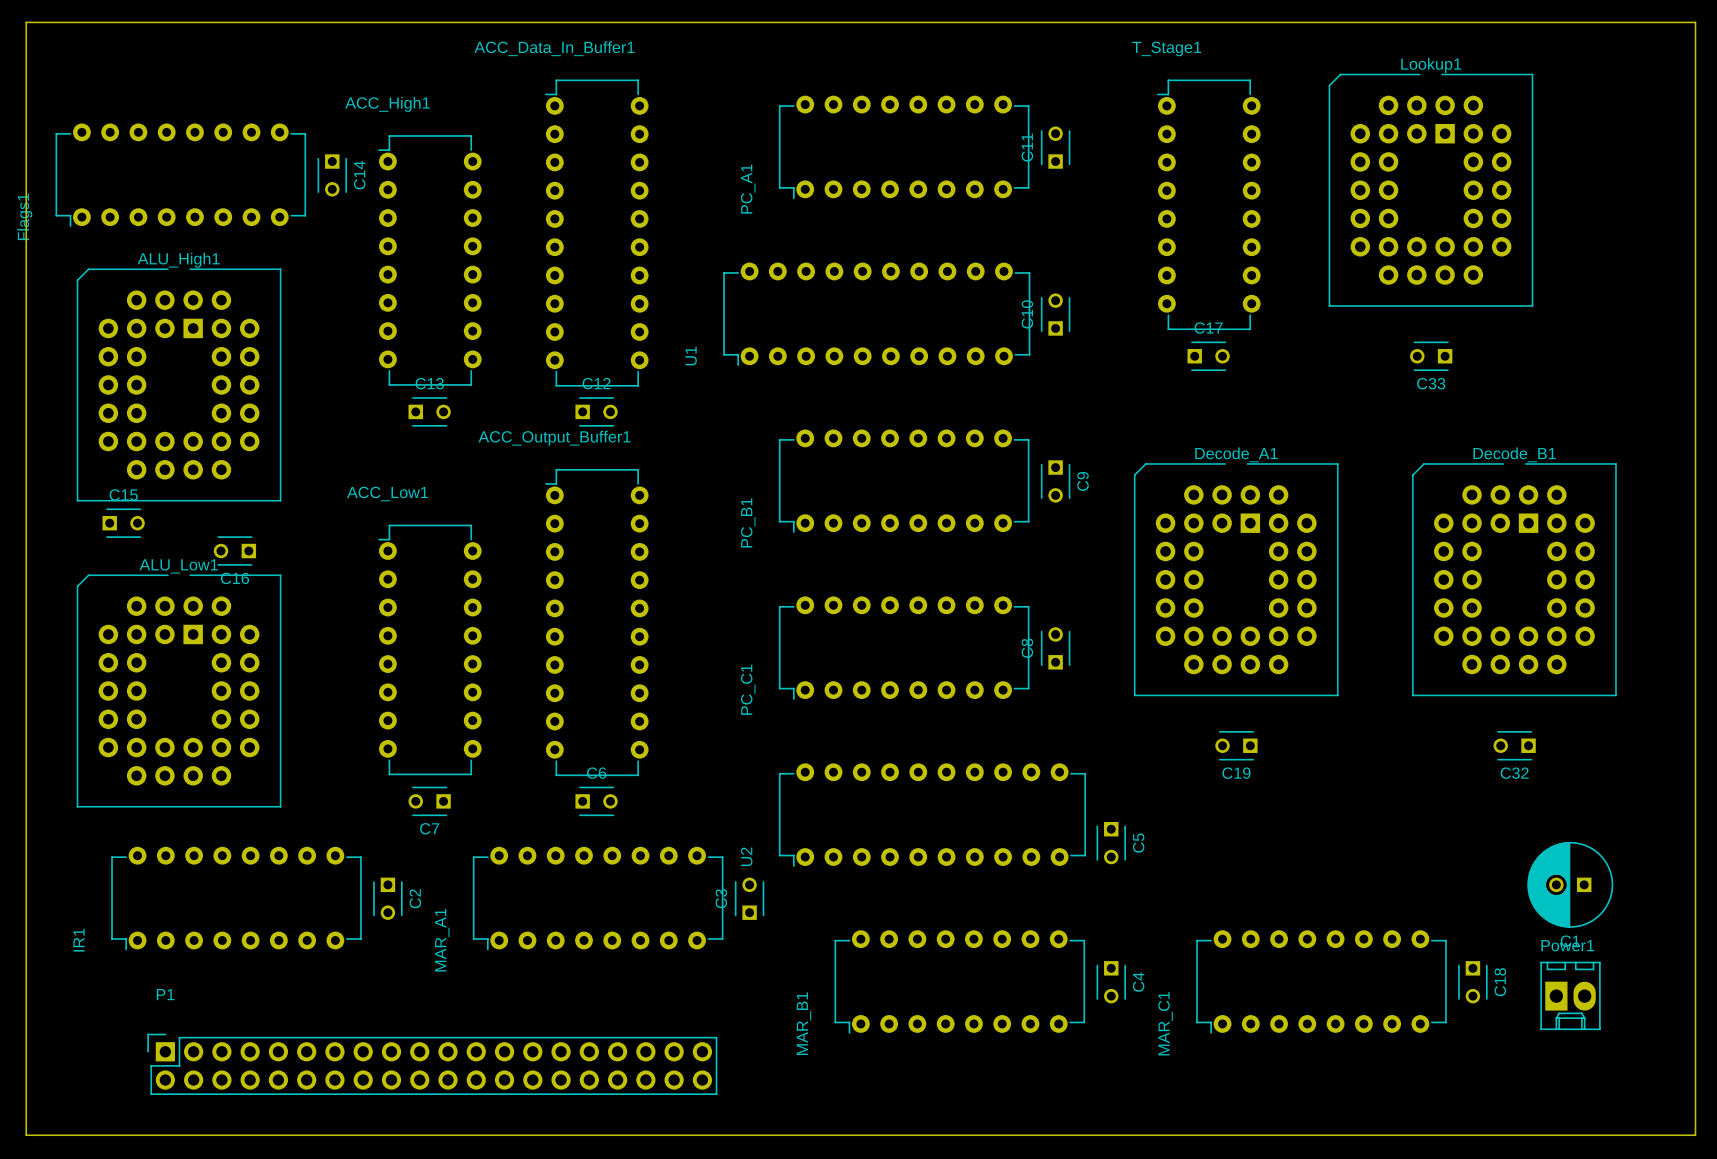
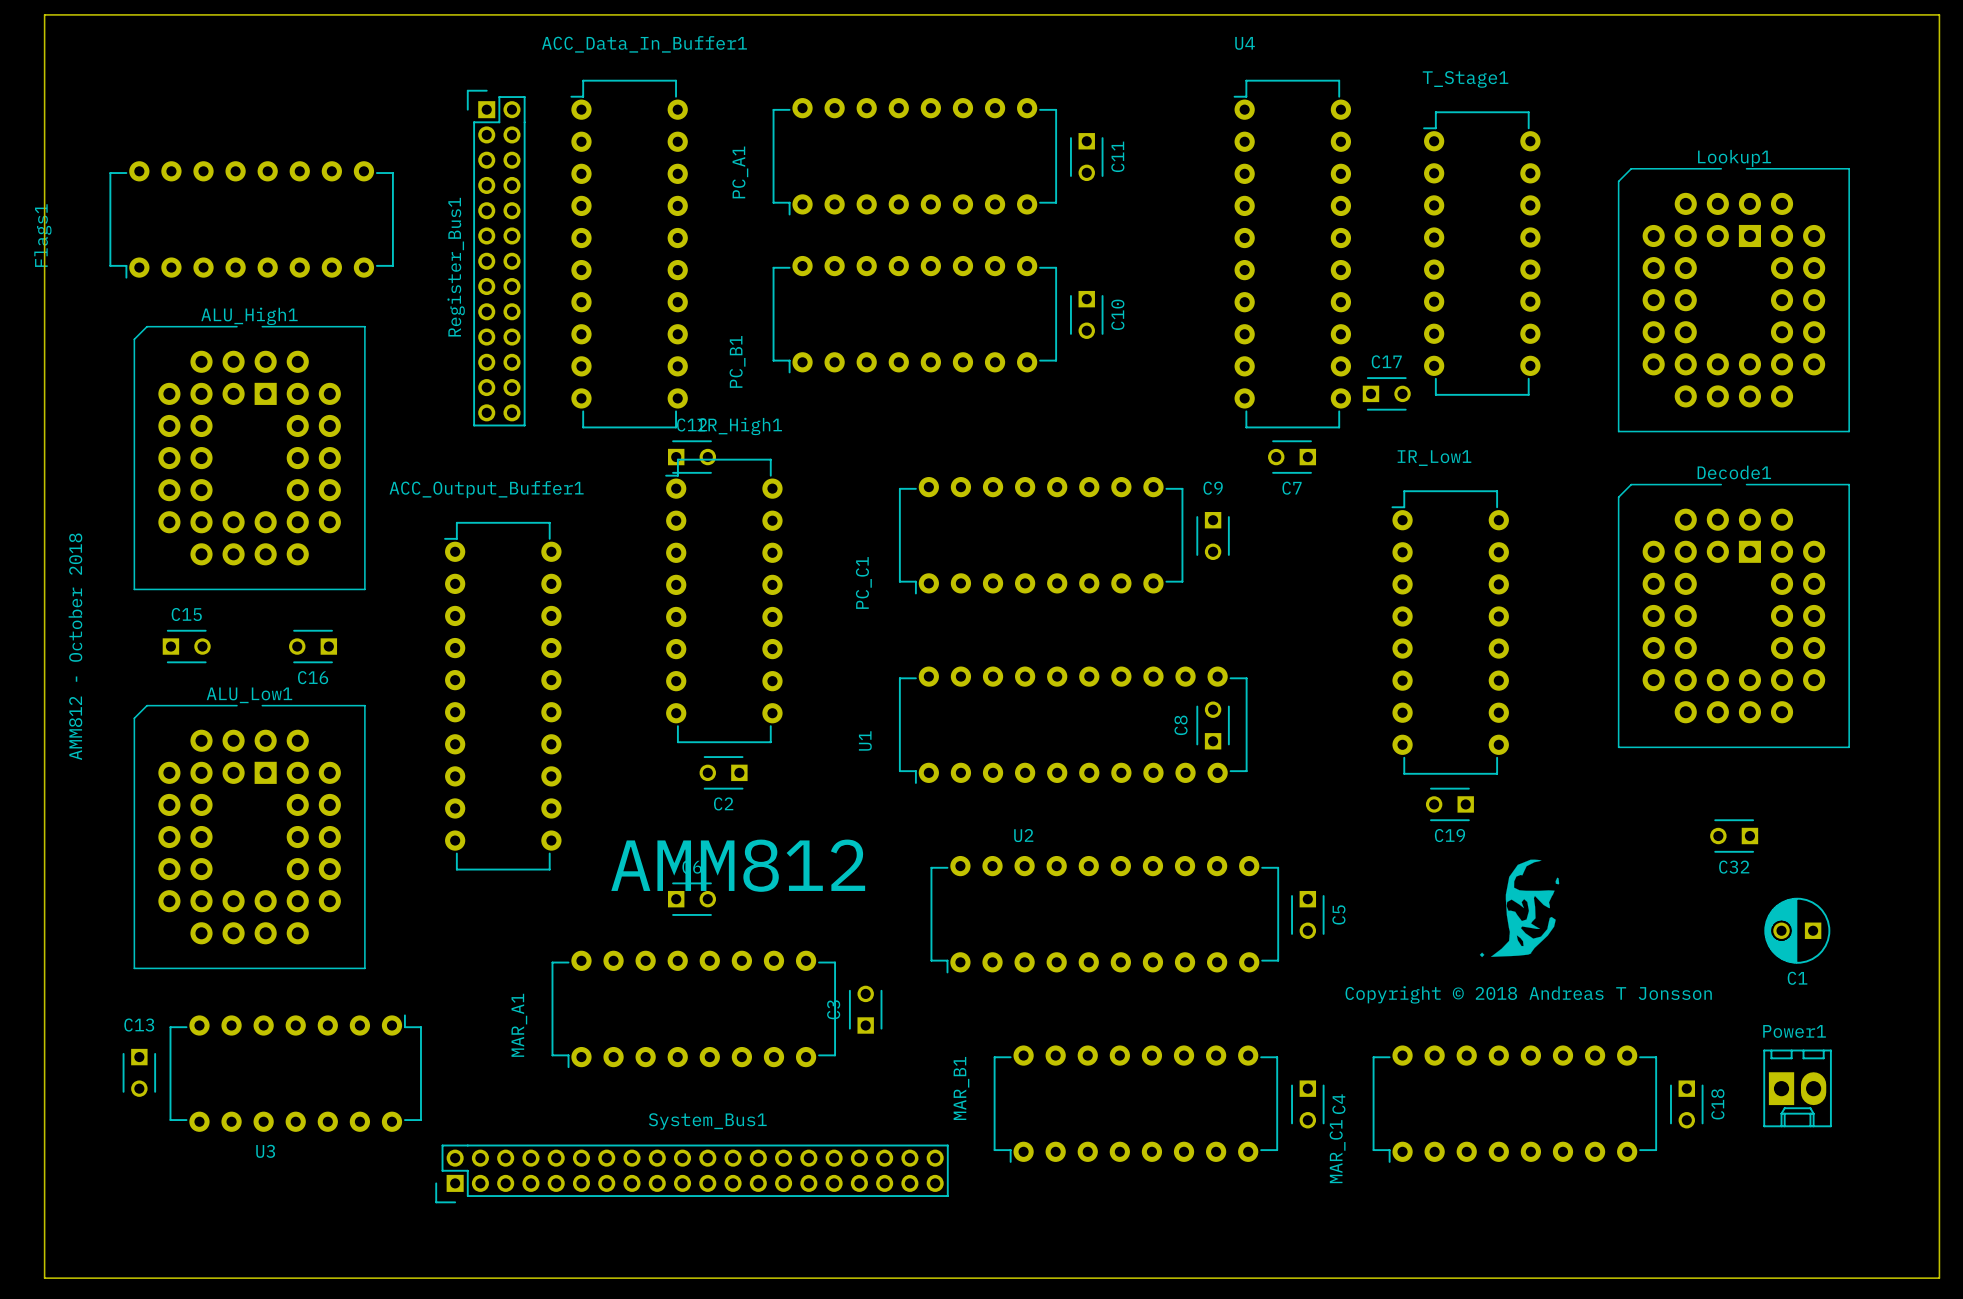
T_Stage1 name position: T_Stage1 (1166, 48) -> T_Stage1 (1465, 79)
PC_A1 position: (904, 147) -> (914, 156)
C11 rotation: 0° (1055, 147) -> 180° (1086, 157)
C11 position: (1055, 147) -> (1086, 157)
Flags1 position: (180, 175) -> (251, 219)
C14: (332, 175) -> none
PC_A1 name position: PC_A1 (748, 189) -> PC_A1 (740, 172)
Lookup1 position: (1430, 190) -> (1733, 300)
T_Stage1 position: (1208, 204) -> (1481, 253)
ACC_Data_In_Buffer1 position: (596, 233) -> (629, 254)
U4: none -> (1292, 254)
Register_Bus1: none -> (496, 258)
ACC_High1: (429, 260) -> none
PC_B1: none -> (914, 314)
U1 position: (876, 314) -> (1073, 725)
C10 rotation: 0° (1055, 314) -> 180° (1086, 314)
C10 position: (1055, 314) -> (1086, 314)
U1 name position: U1 (691, 356) -> U1 (865, 740)
C33: (1431, 356) -> none
ALU_High1 position: (179, 384) -> (249, 458)
C13 rotation: 0° (429, 411) -> 90° clockwise (139, 1072)
C13 position: (429, 411) -> (139, 1072)
ACC_Output_Buffer1 name position: ACC_Output_Buffer1 (554, 438) -> ACC_Output_Buffer1 (486, 489)
C9 name rotation: 0° (1083, 481) -> 90° clockwise (1213, 488)
C9 name position: C9 (1083, 481) -> C9 (1213, 488)
PC_B1 name: PC_B1 (748, 522) -> PC_C1 (863, 582)
C15 position: (123, 523) -> (186, 646)
IR_High1: none -> (723, 600)
C16 position: (234, 551) -> (313, 646)
Decode1: none -> (1733, 615)
IR_Low1: none -> (1450, 632)
text: none -> AMM812 - October 2018 (75, 646)
Decode_A1: (1236, 579) -> none
Decode_B1: (1514, 579) -> none
ACC_Output_Buffer1 position: (596, 622) -> (502, 696)
PC_C1: (904, 648) -> none
ACC_Low1: (429, 649) -> none
ALU_Low1 position: (179, 691) -> (249, 837)
C19 position: (1236, 745) -> (1449, 804)
drawing: none -> [1479, 859, 1560, 958]
text: none -> AMM812 (738, 865)
C7 position: (429, 801) -> (1292, 457)
U2 position: (932, 815) -> (1104, 914)
C1 footprint: [1527, 841, 1614, 928] -> [1764, 897, 1831, 964]
C5 position: (1111, 843) -> (1307, 914)
U2 name rotation: 0° (746, 856) -> 90° clockwise (1023, 835)
U2 name position: U2 (746, 856) -> U2 (1023, 835)
text: none -> Copyright © 2018 Andreas T Jonsson (1528, 994)
IR1: (236, 898) -> none
C2 rotation: 0° (387, 898) -> 90° clockwise (723, 772)
C2 position: (387, 898) -> (723, 772)
MAR_A1 name position: MAR_A1 (442, 940) -> MAR_A1 (519, 1025)
U3: none -> (295, 1073)
MAR_B1 position: (959, 981) -> (1135, 1104)
C4 position: (1111, 982) -> (1307, 1104)
Power1 position: (1570, 995) -> (1797, 1088)
MAR_B1 name position: MAR_B1 (803, 1023) -> MAR_B1 (961, 1088)
System_Bus1: none -> (692, 1173)
P1: (432, 1064) -> none

